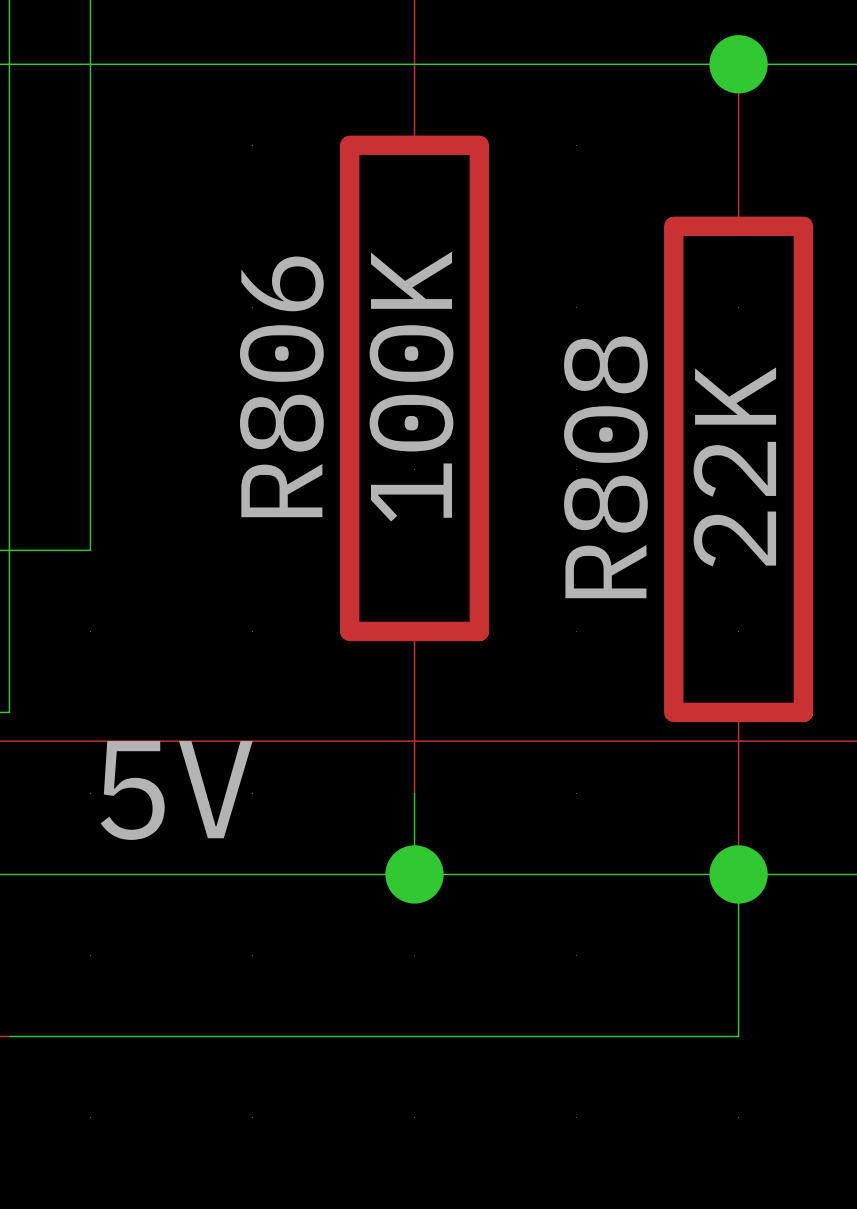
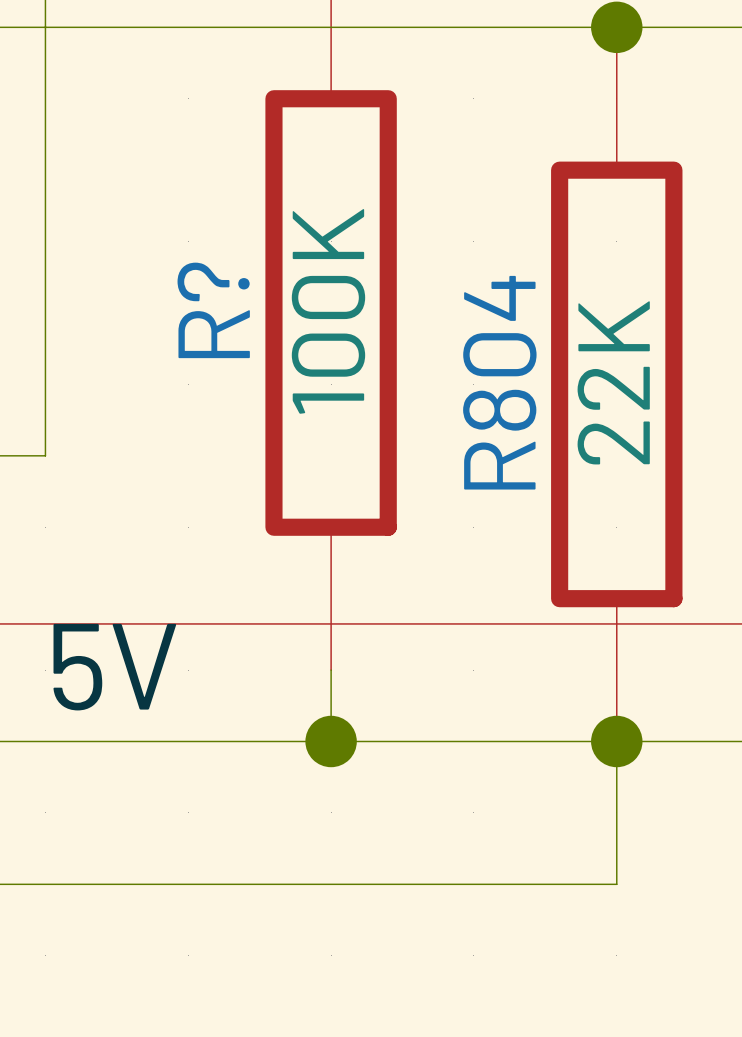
R806 name: R806 (281, 386) -> R? (213, 310)
R808 name: R808 (605, 467) -> R804 (499, 382)

